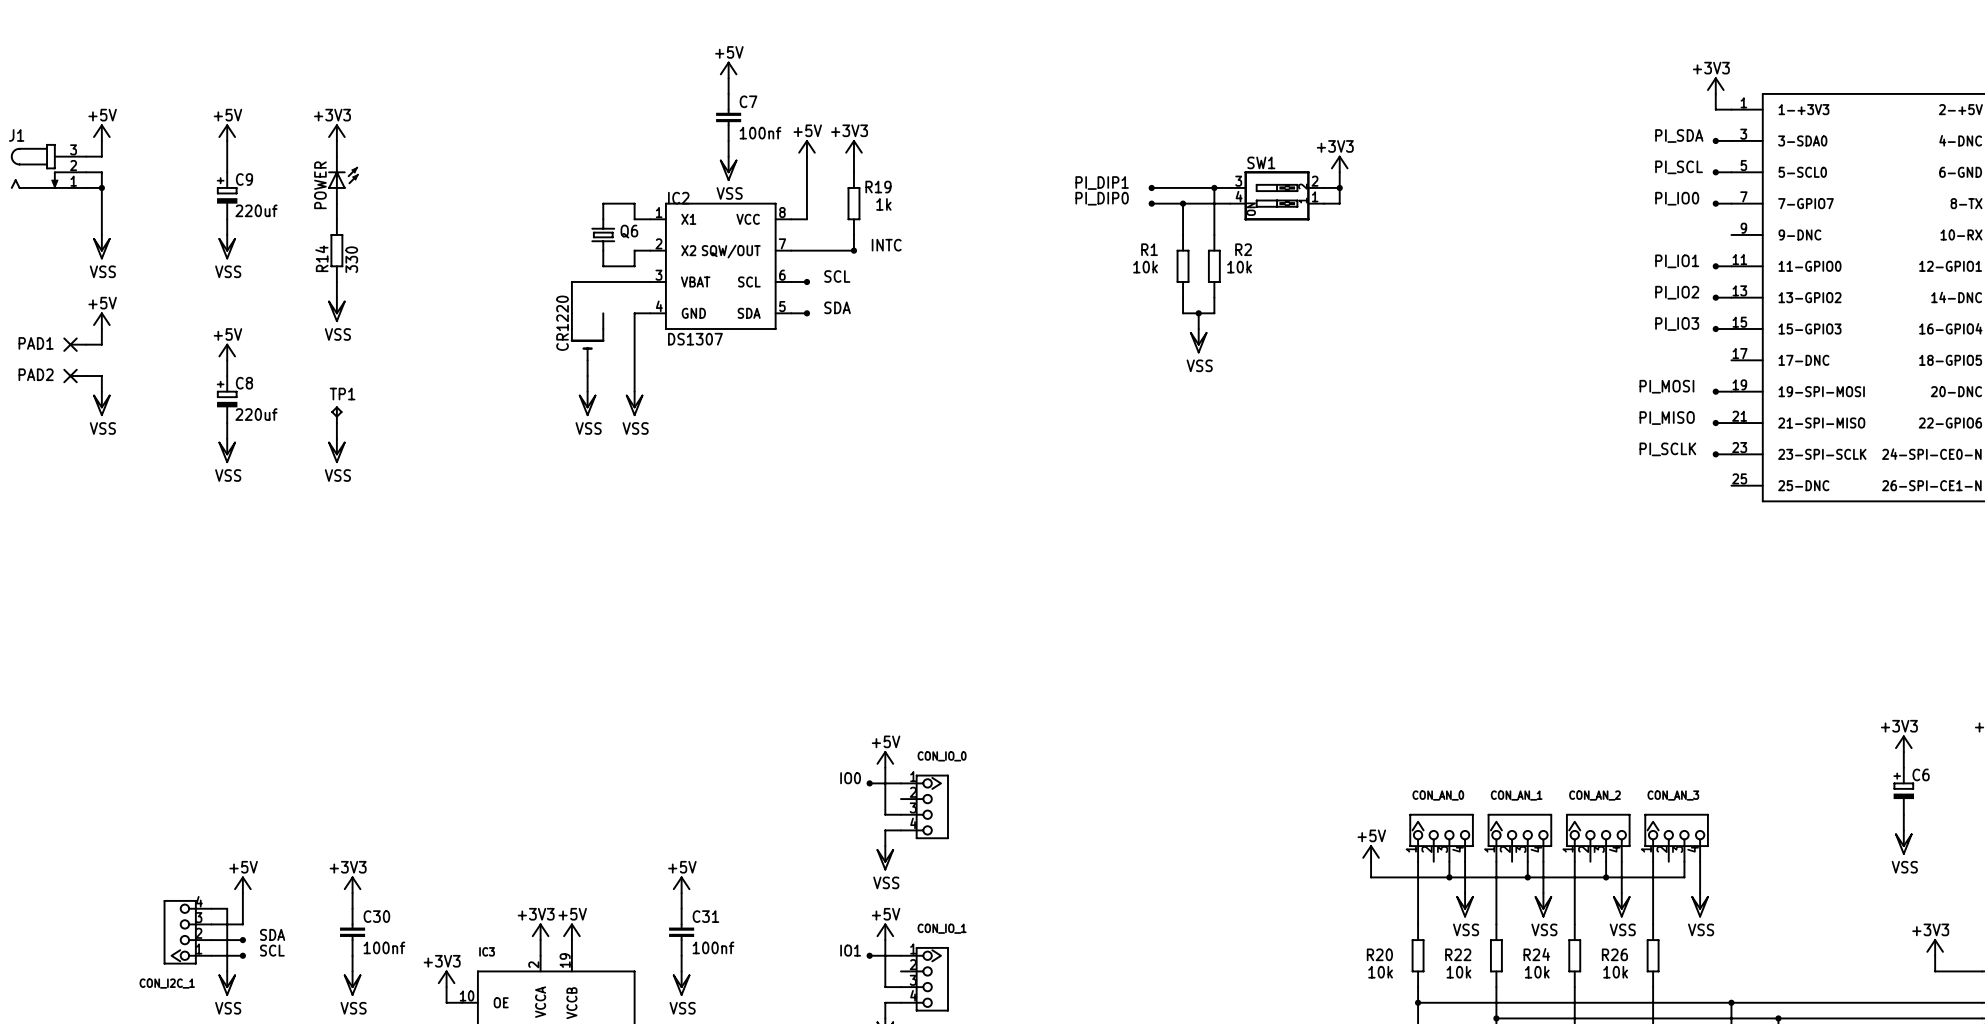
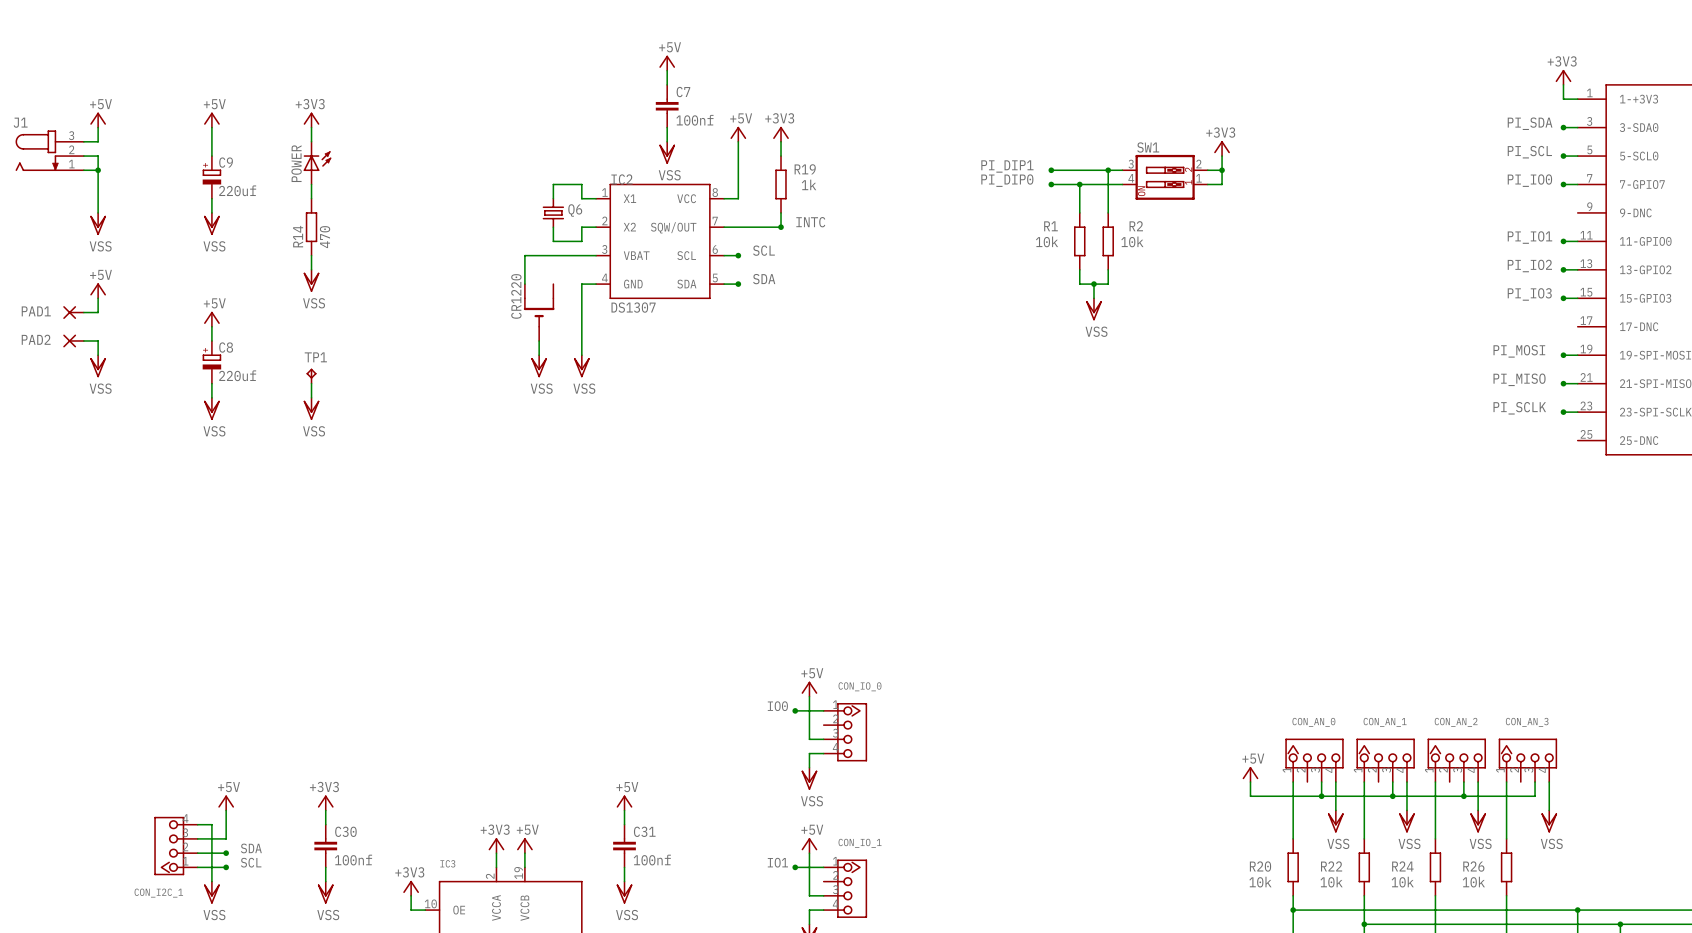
R14 value: 330 (351, 259) -> 470 (325, 237)

